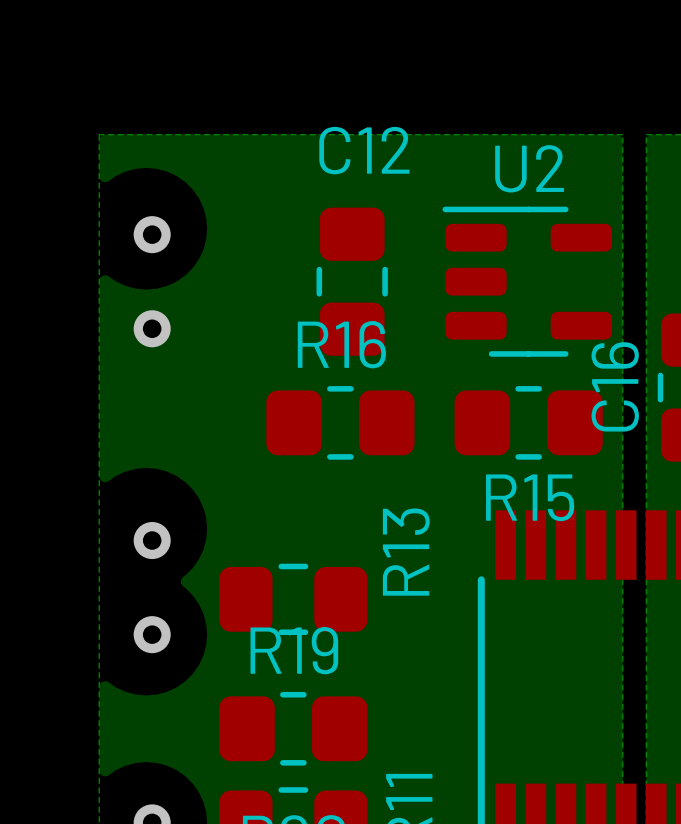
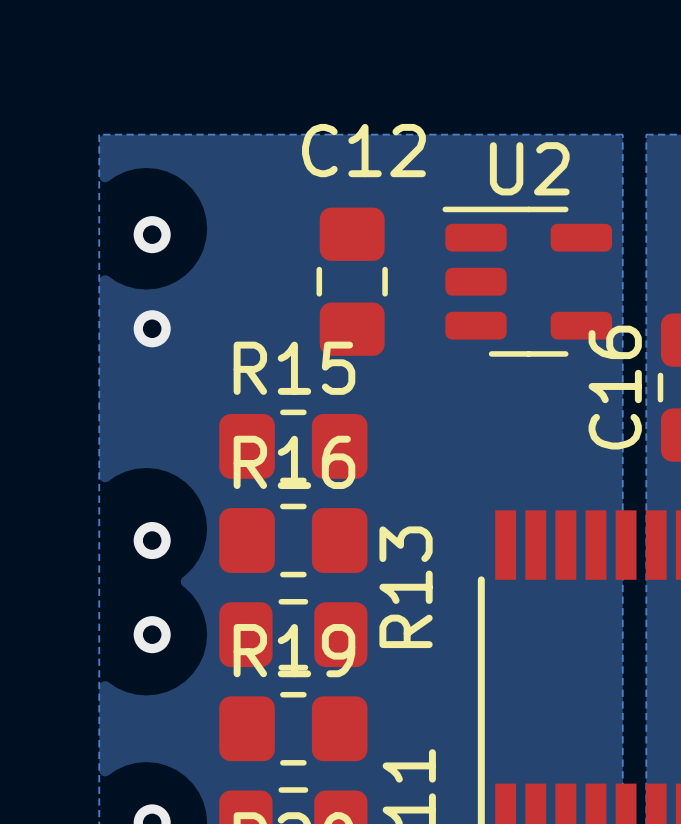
R16 position: (340, 422) -> (293, 540)
R15 position: (528, 422) -> (293, 446)
R15 name position: R15 (530, 497) -> R15 (294, 368)
R13 position: (293, 599) -> (293, 634)

